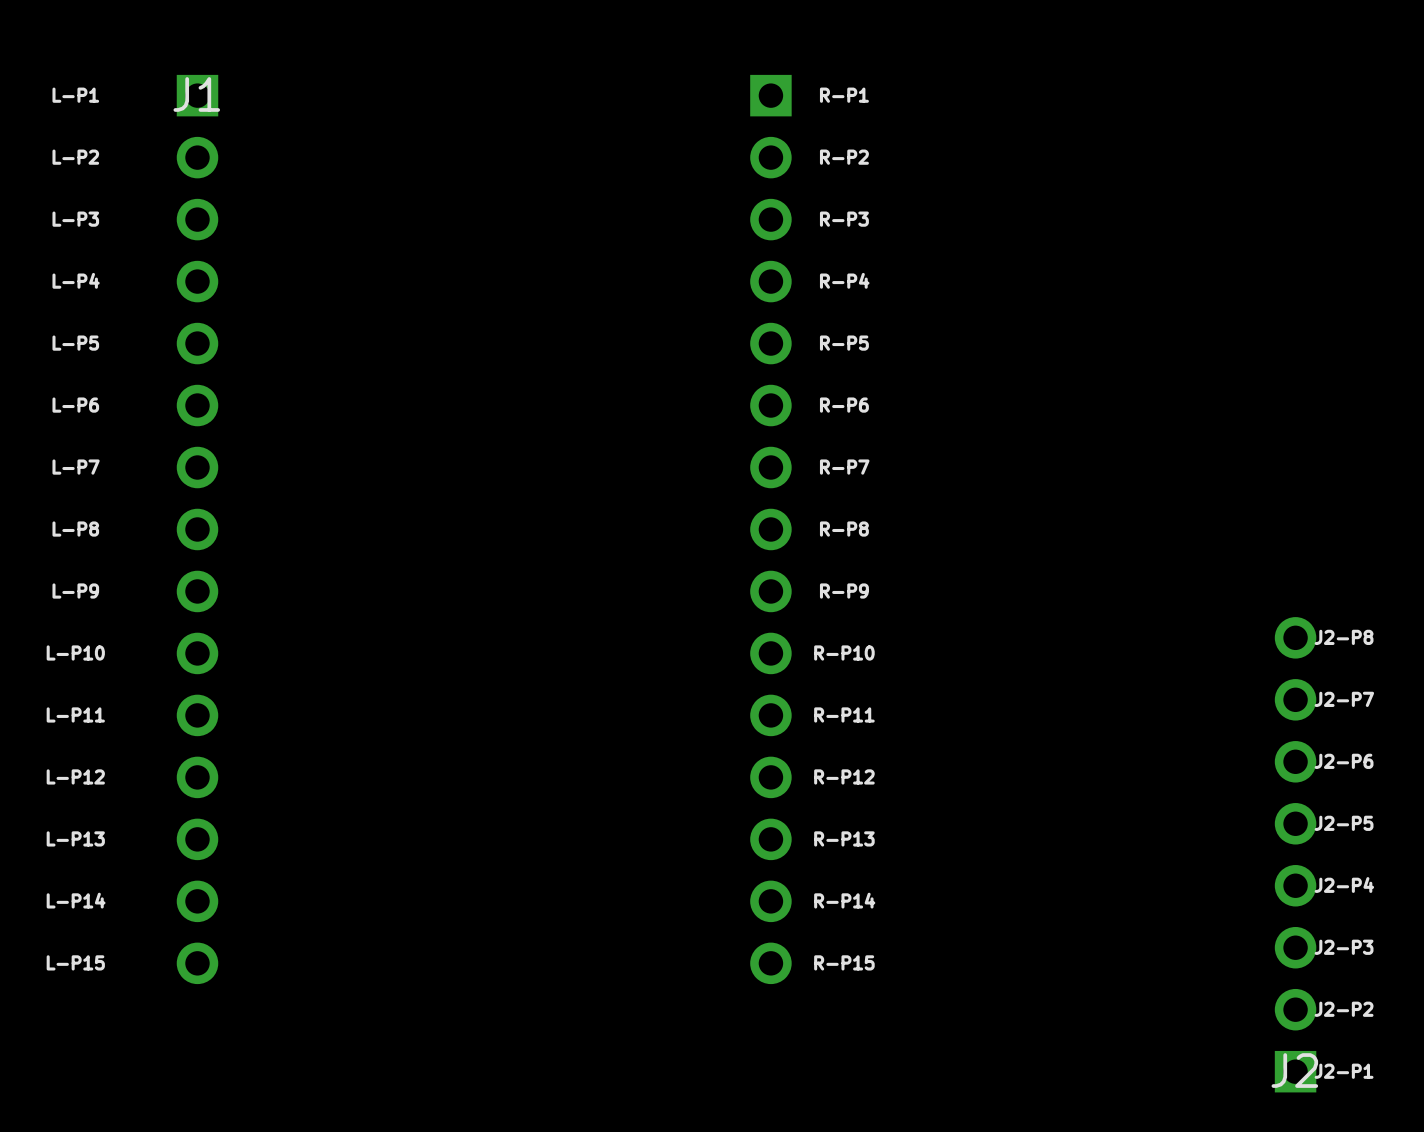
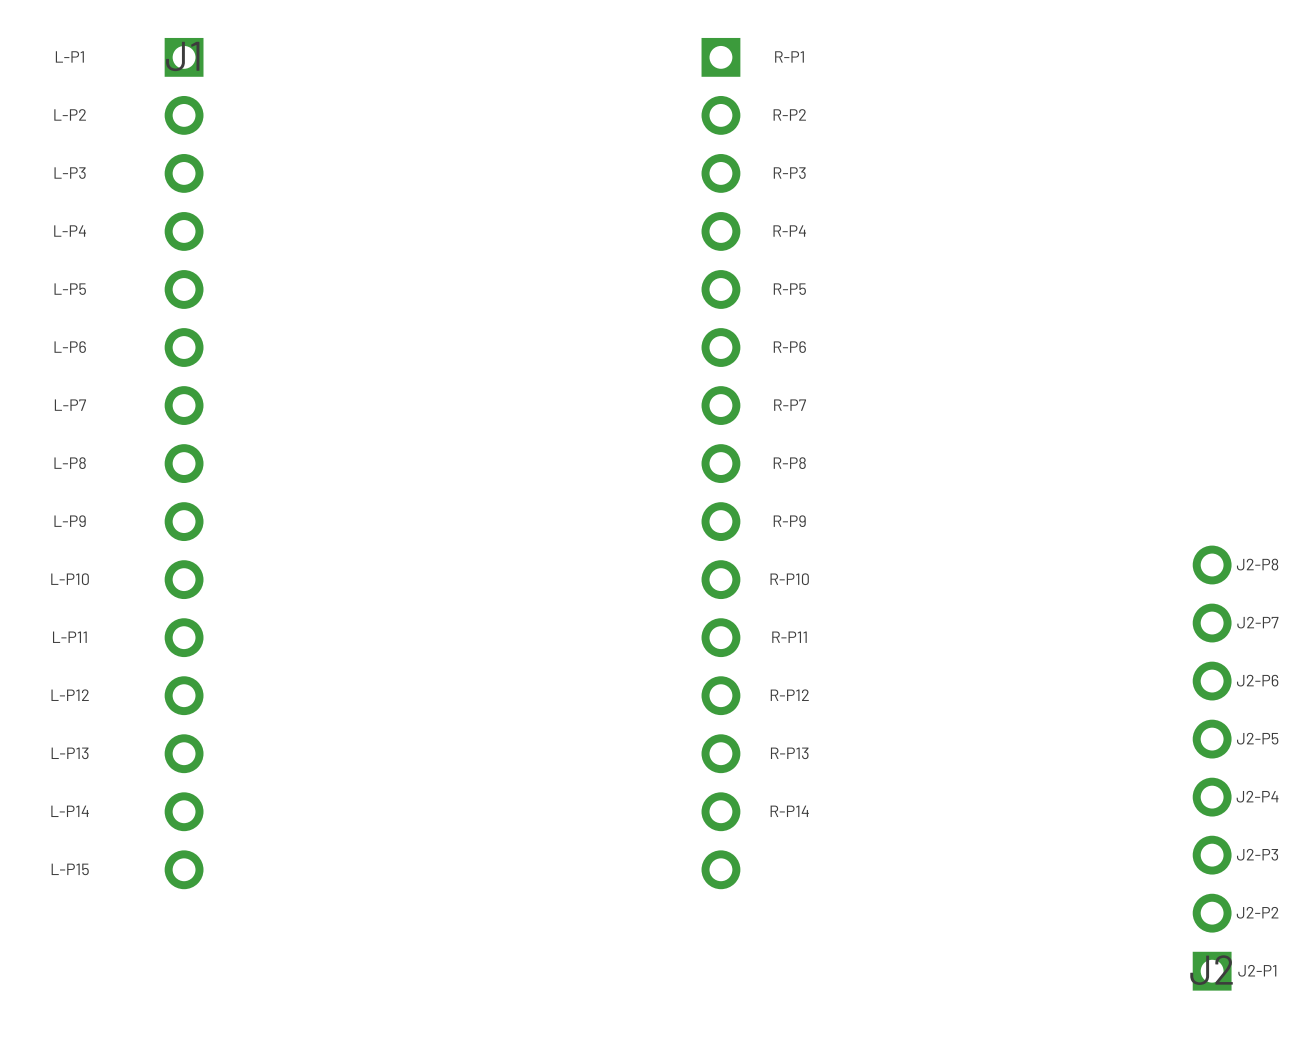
text: R-P15 (844, 962) -> none

